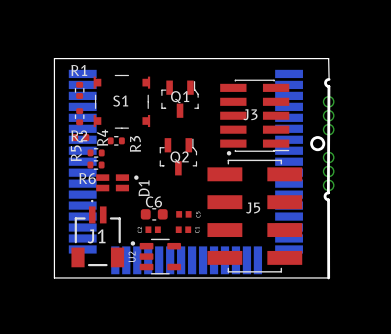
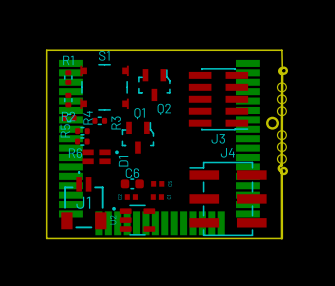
round board edge: none -> [279, 66, 288, 75]
Q1 name: Q1 (180, 97) -> Q2 (164, 109)
S1 name position: S1 (120, 101) -> S1 (104, 55)
J3 name position: J3 (250, 114) -> J3 (218, 138)
Q2: (178, 156) -> none
Q1: none -> (137, 137)
round board edge: none -> [279, 166, 288, 176]
J5: (254, 211) -> none
J4: none -> (228, 198)

